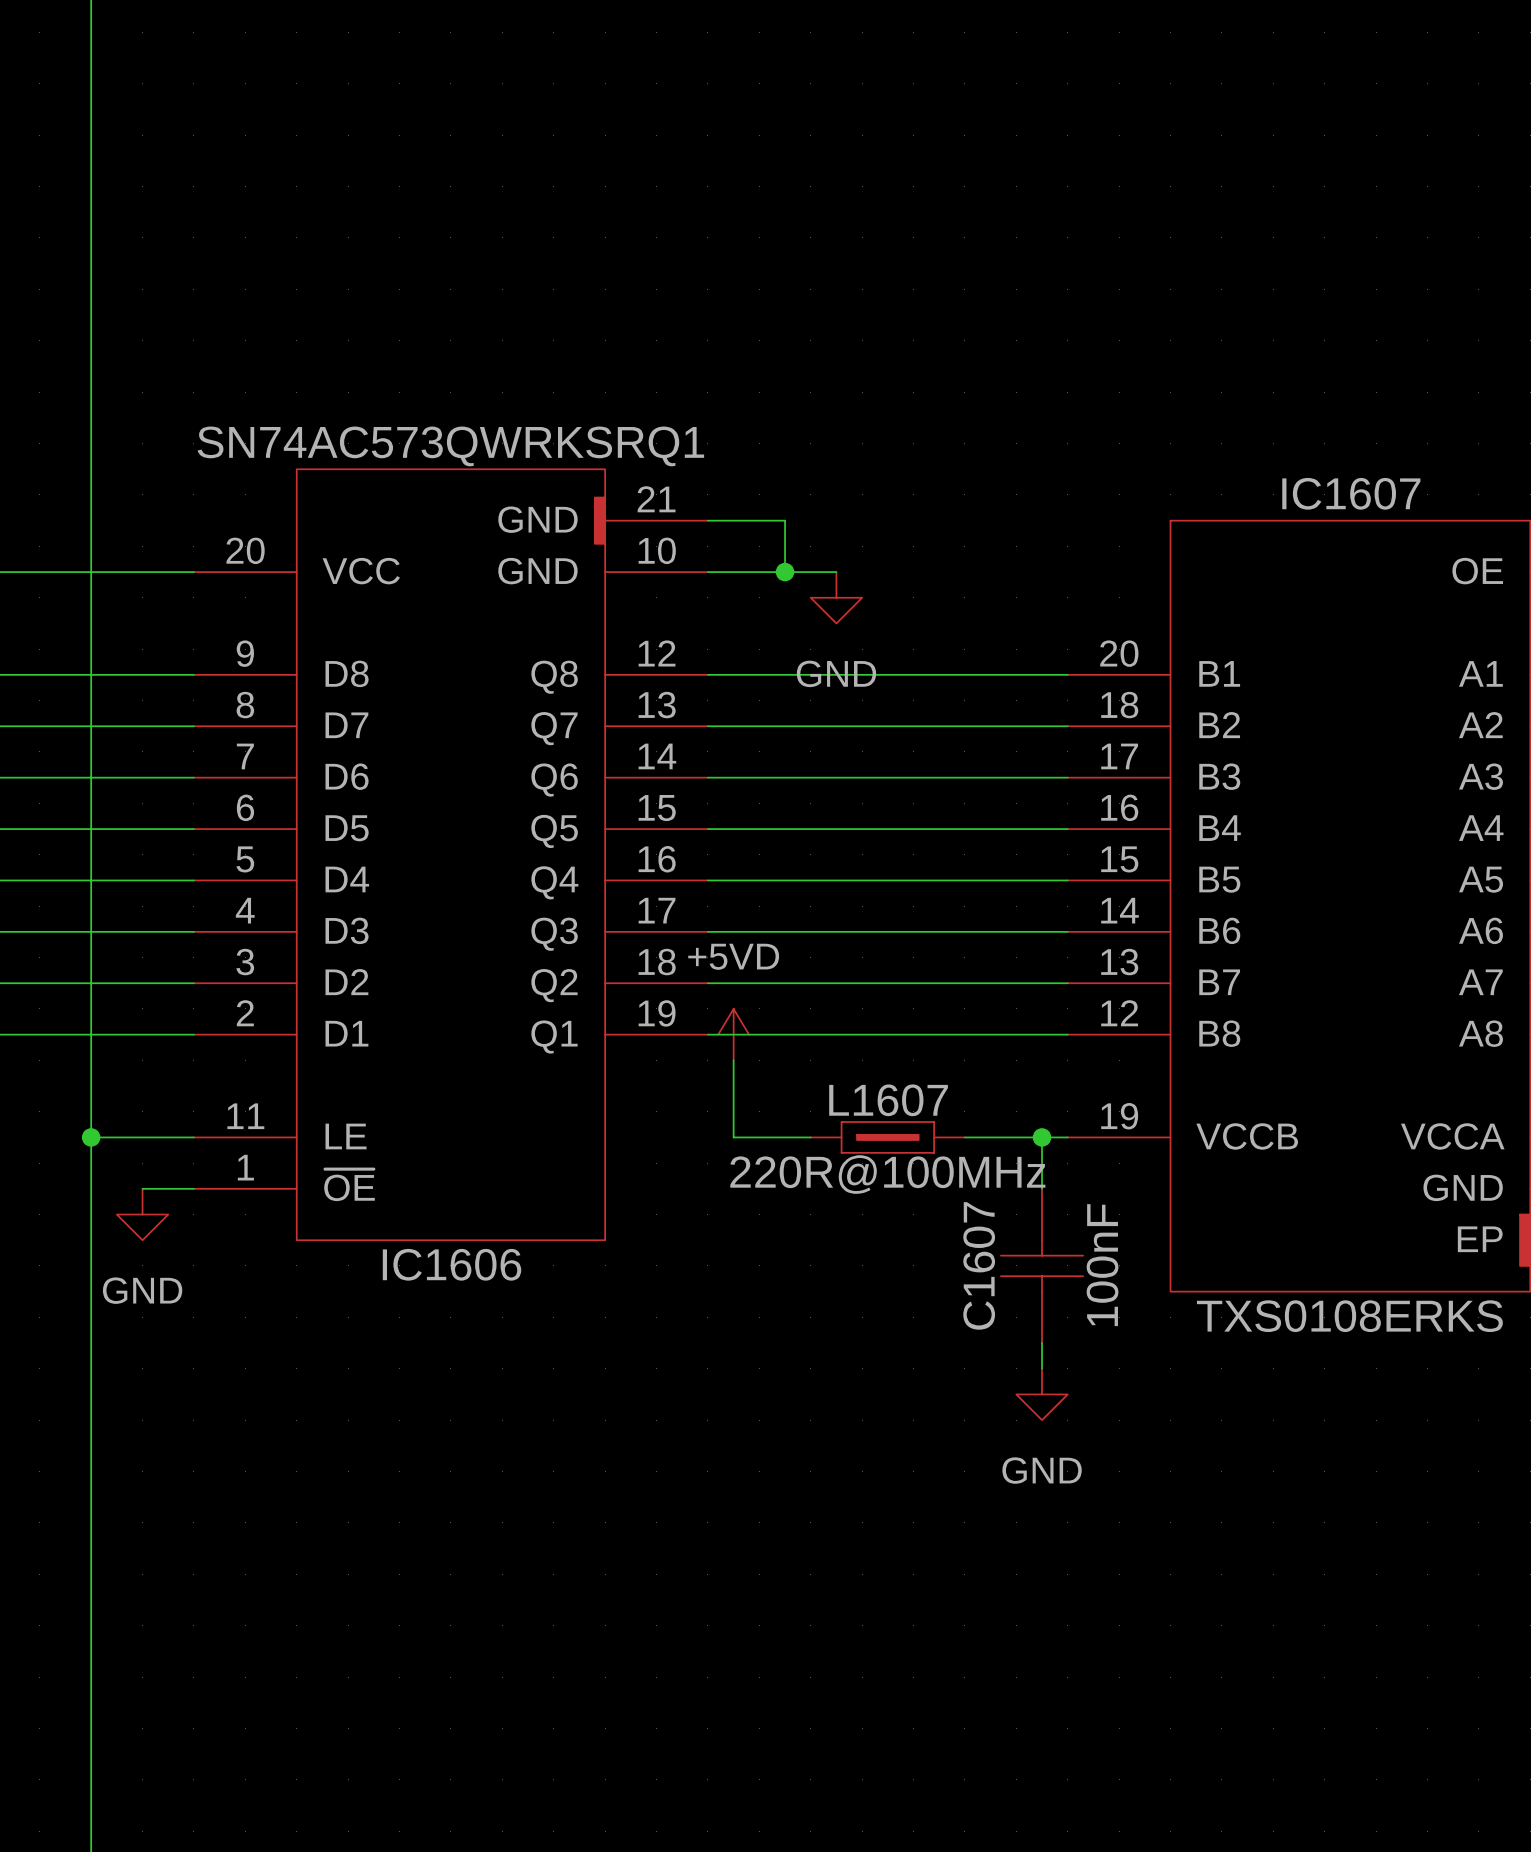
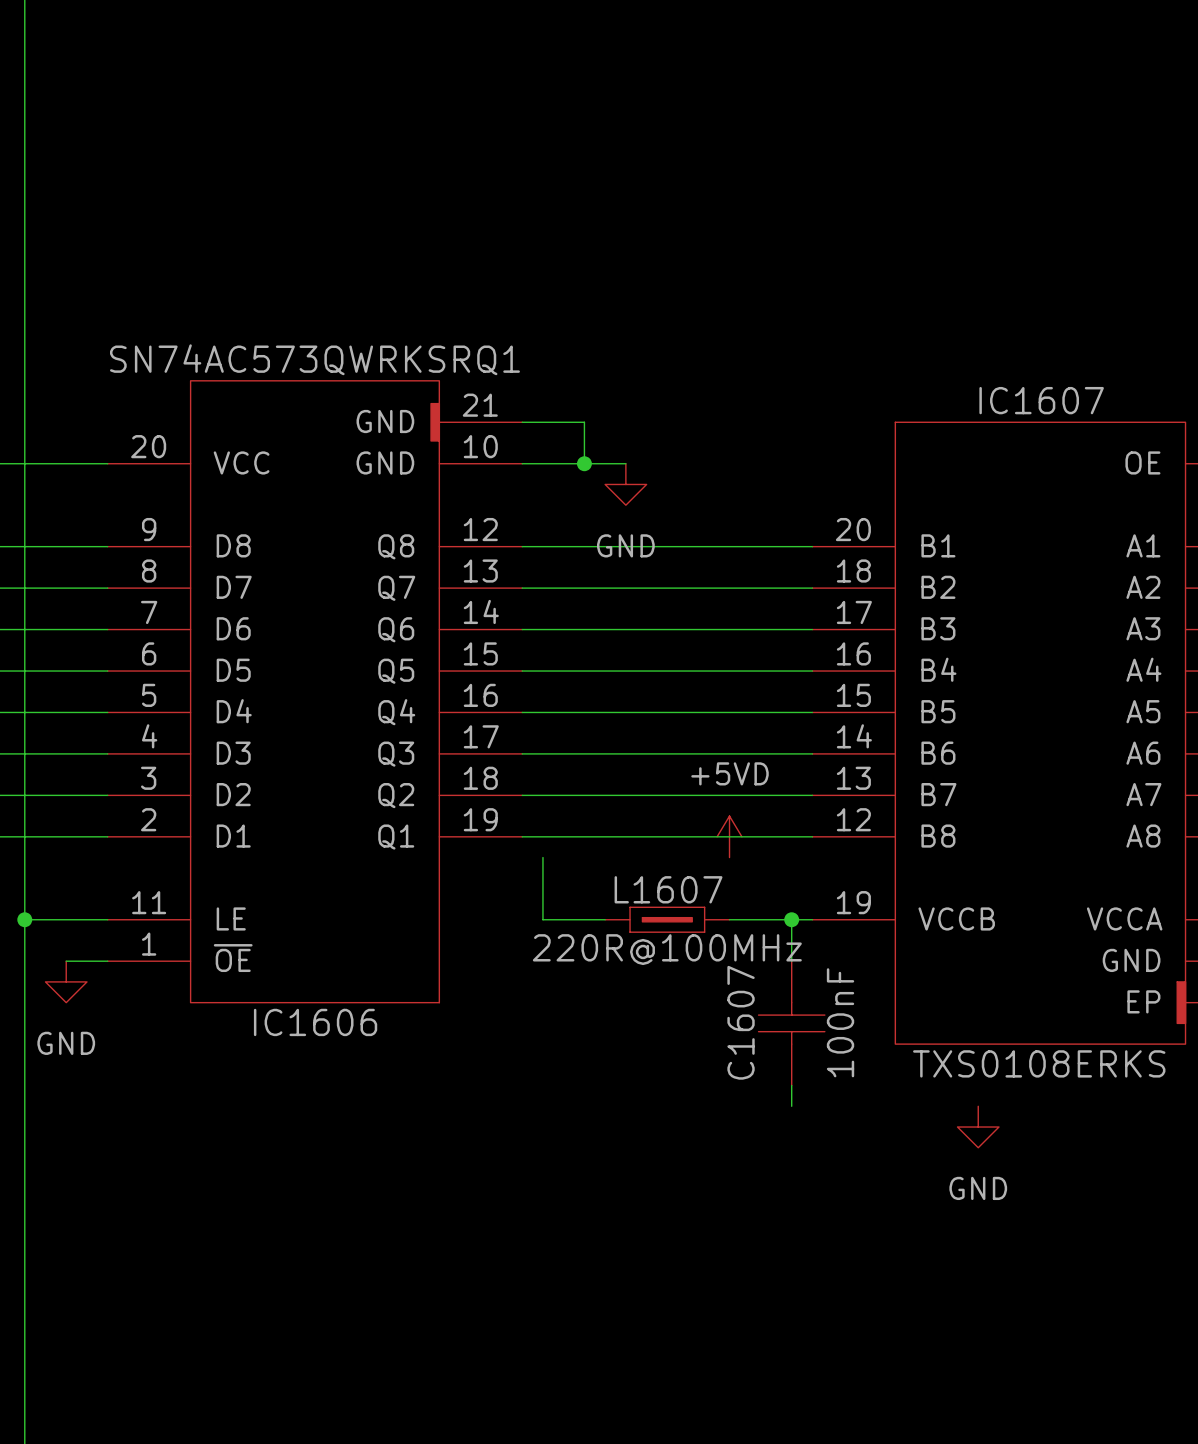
power symbol position: +5VD (733, 1034) -> +5VD (729, 836)
power symbol: GND (1042, 1394) -> none
power symbol: none -> GND (978, 1127)

